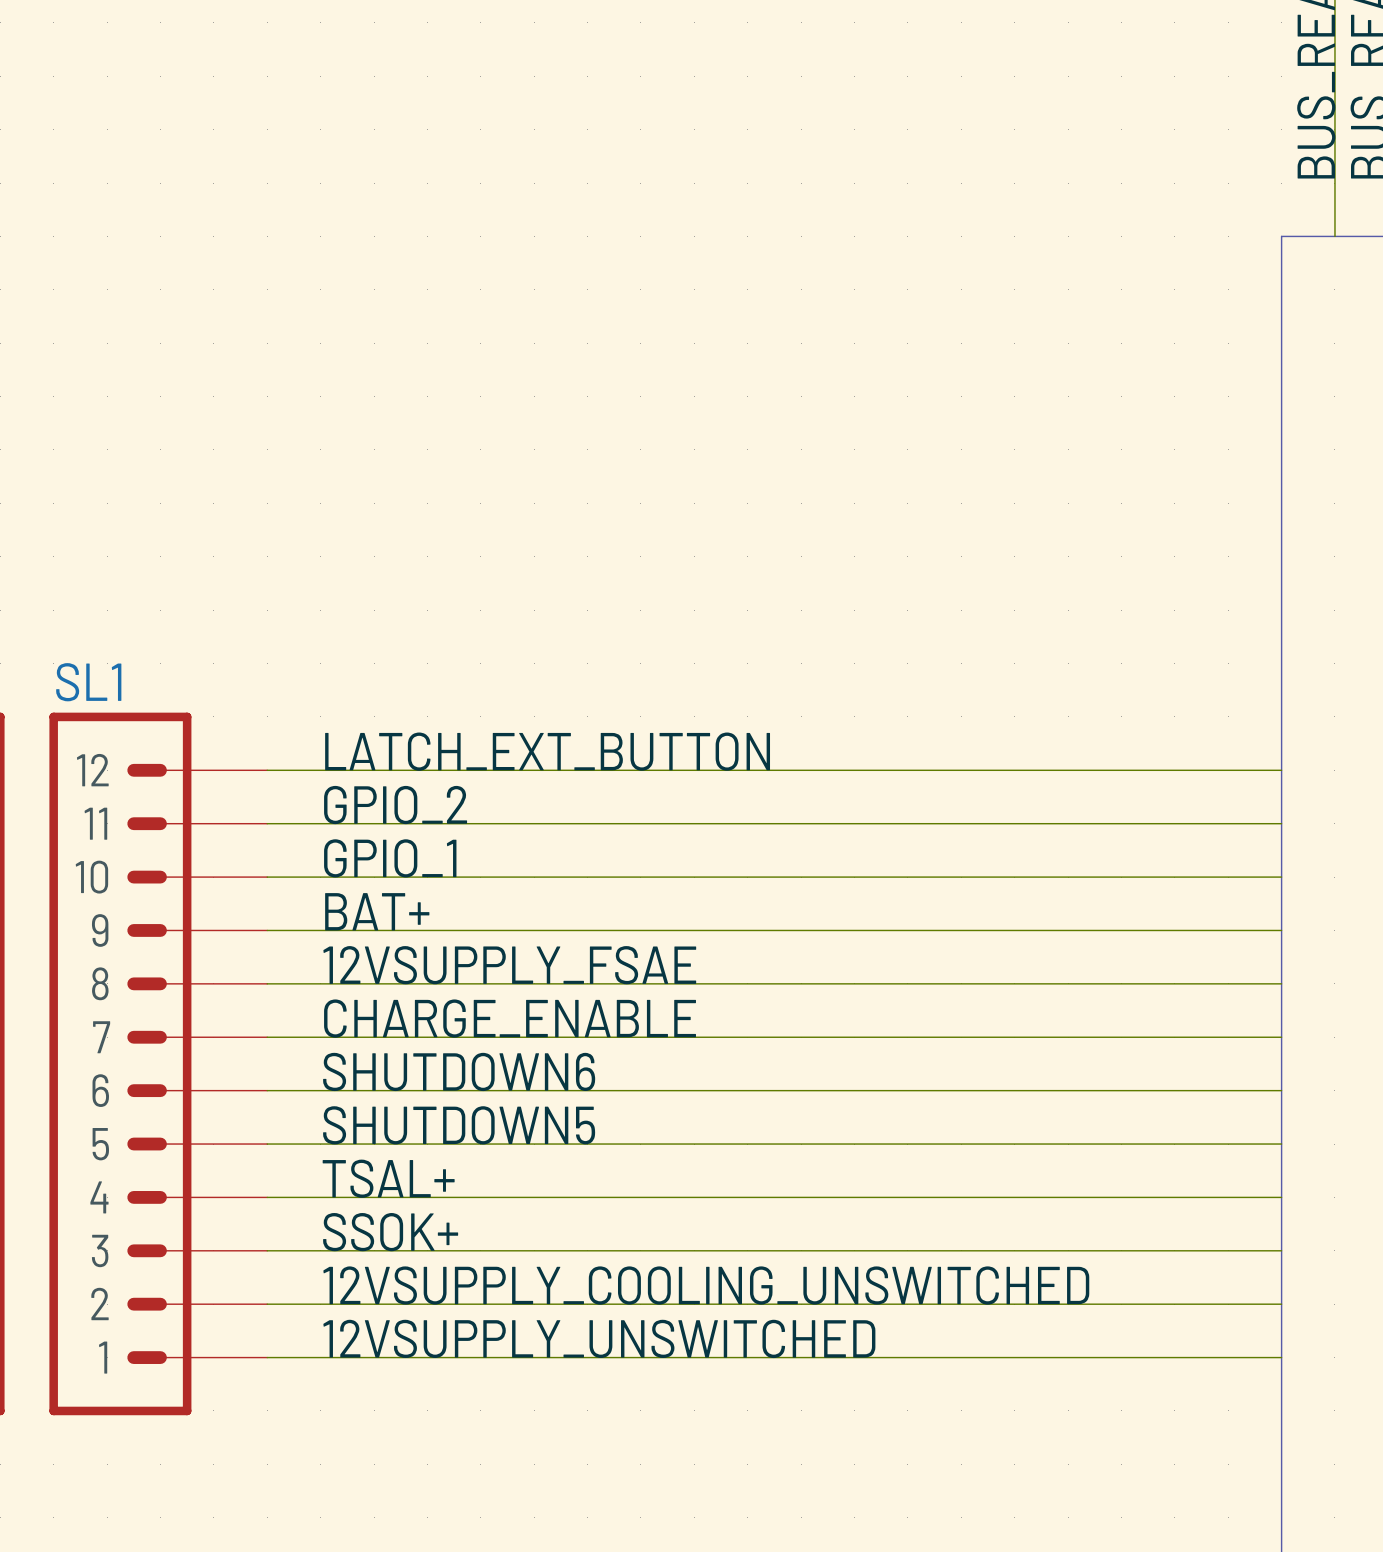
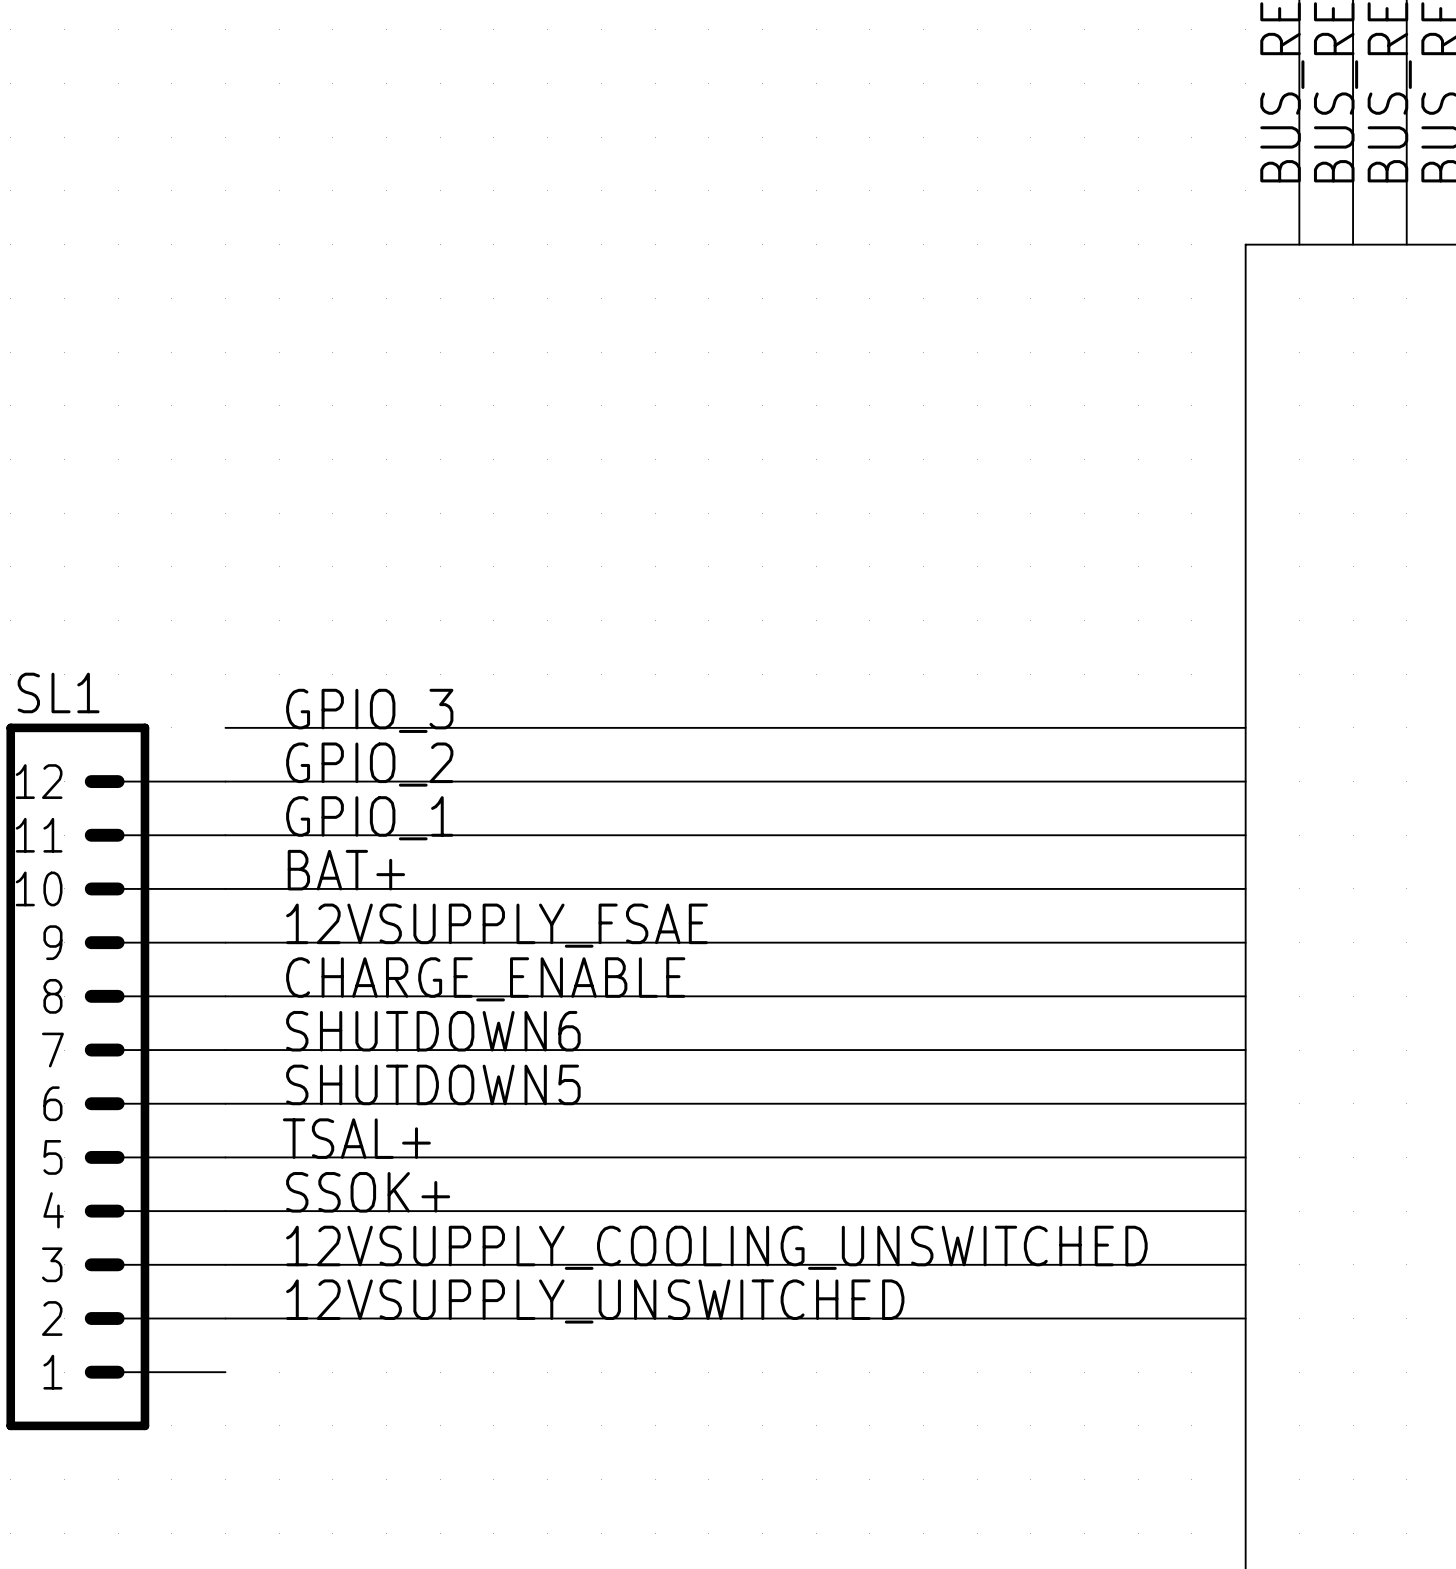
label: none -> GPIO_3 (369, 710)
wire: none -> (225, 727) (1245, 727)
label: LATCH_EXT_BUTTON (547, 751) -> GPIO_2 (369, 764)
label: GPIO_2 (395, 805) -> GPIO_1 (369, 818)
label: GPIO_1 (390, 858) -> BAT+ (346, 870)
label: BAT+ (377, 911) -> 12VSUPPLY_FSAE (497, 925)
label: 12VSUPPLY_FSAE (509, 965) -> CHARGE_ENABLE (485, 979)
label: CHARGE_ENABLE (510, 1018) -> SHUTDOWN6 (433, 1031)
label: SHUTDOWN6 (459, 1071) -> SHUTDOWN5 (433, 1084)
label: SHUTDOWN5 (459, 1125) -> TSAL+ (356, 1138)
label: TSAL+ (388, 1178) -> SSOK+ (368, 1192)
label: SSOK+ (390, 1232) -> 12VSUPPLY_COOLING_UNSWITCHED (716, 1247)
label: 12VSUPPLY_COOLING_UNSWITCHED (706, 1285) -> 12VSUPPLY_UNSWITCHED (595, 1301)
label: 12VSUPPLY_UNSWITCHED (599, 1338) -> none
wire: (267, 1357) (1281, 1357) -> none

